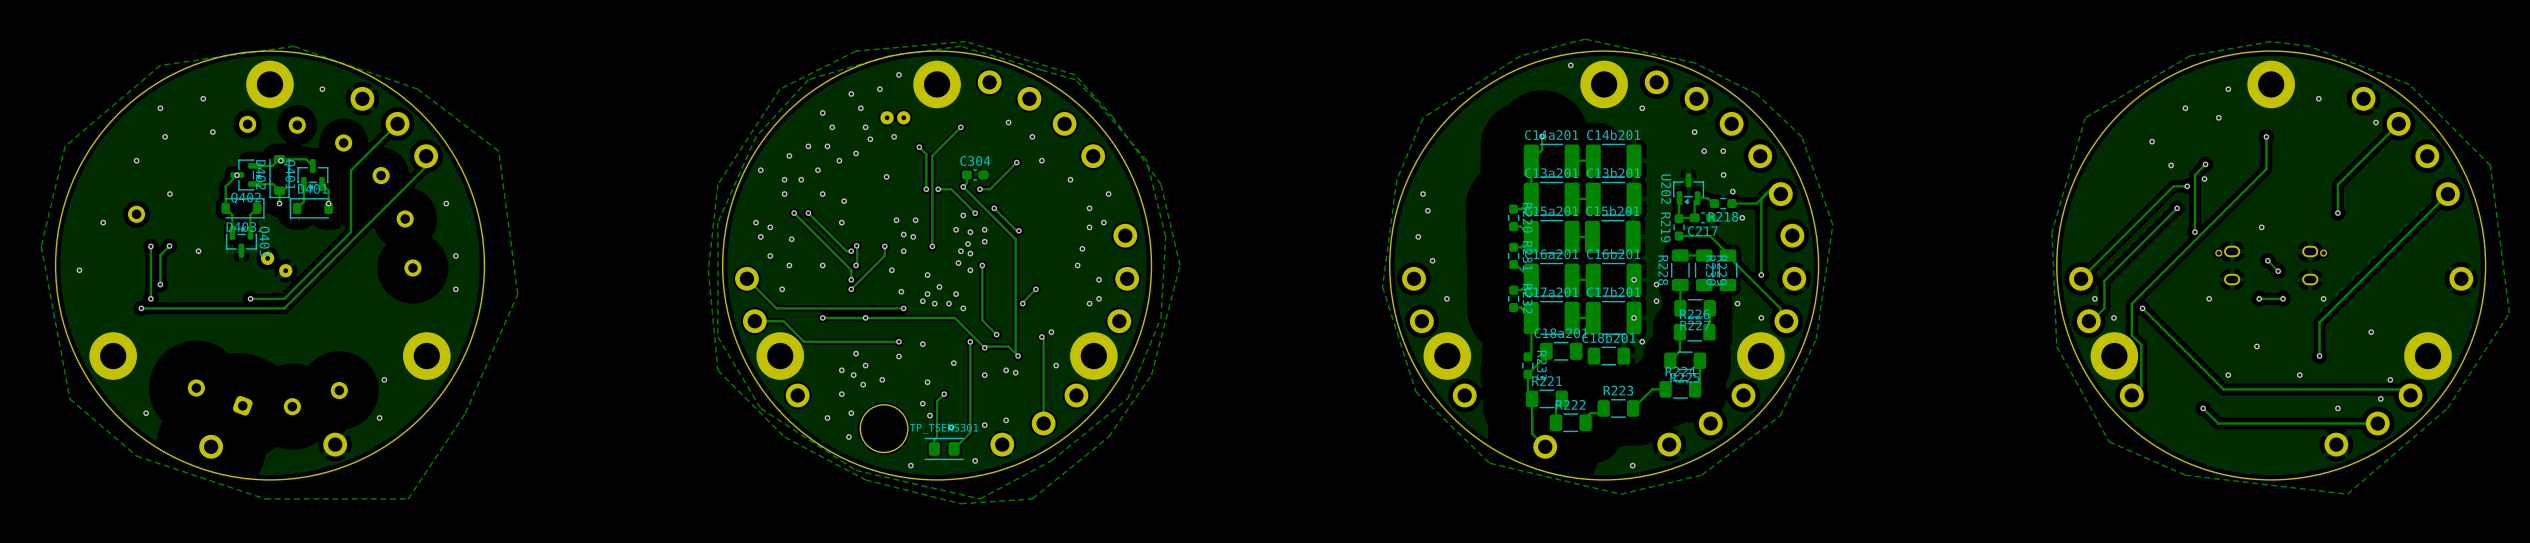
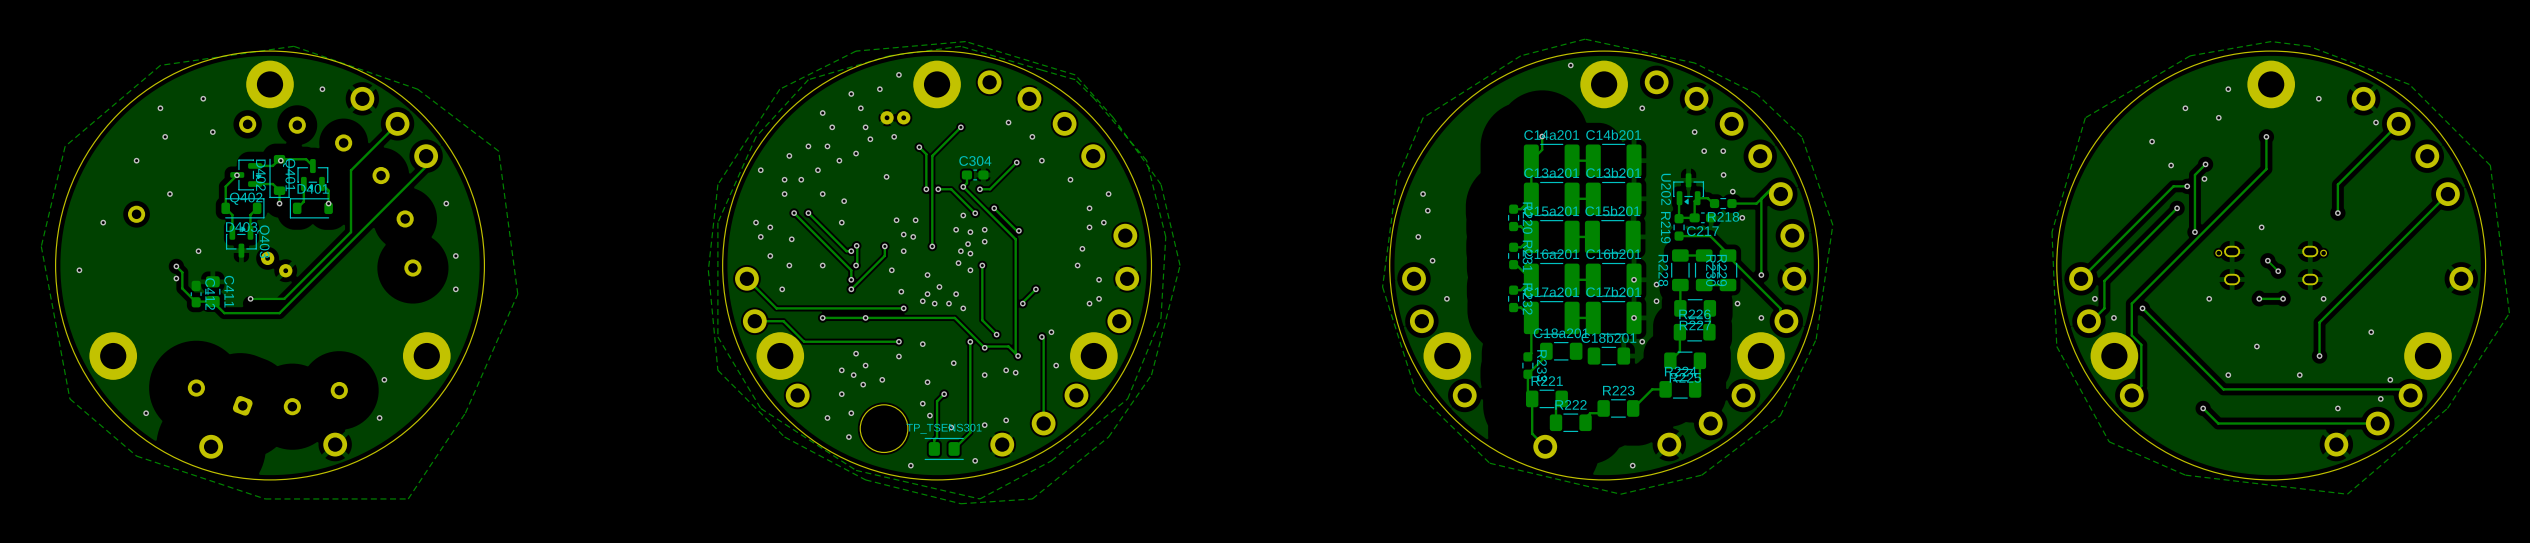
track: (150, 246) (150, 298) -> none
via: (150, 246) -> none
track: (169, 246) (160, 255) (160, 284) -> none
via: (169, 246) -> none
via: none -> (176, 266)
via: none -> (176, 278)
via: (160, 284) -> none
C411: none -> (212, 291)
C412: none -> (196, 294)
via: (150, 298) -> none
via: (141, 308) -> none
track: (284, 308) (141, 308) -> (284, 308) (279, 313) (224, 313) (212, 301) (196, 302) (182, 288) (182, 272) (175, 266)

